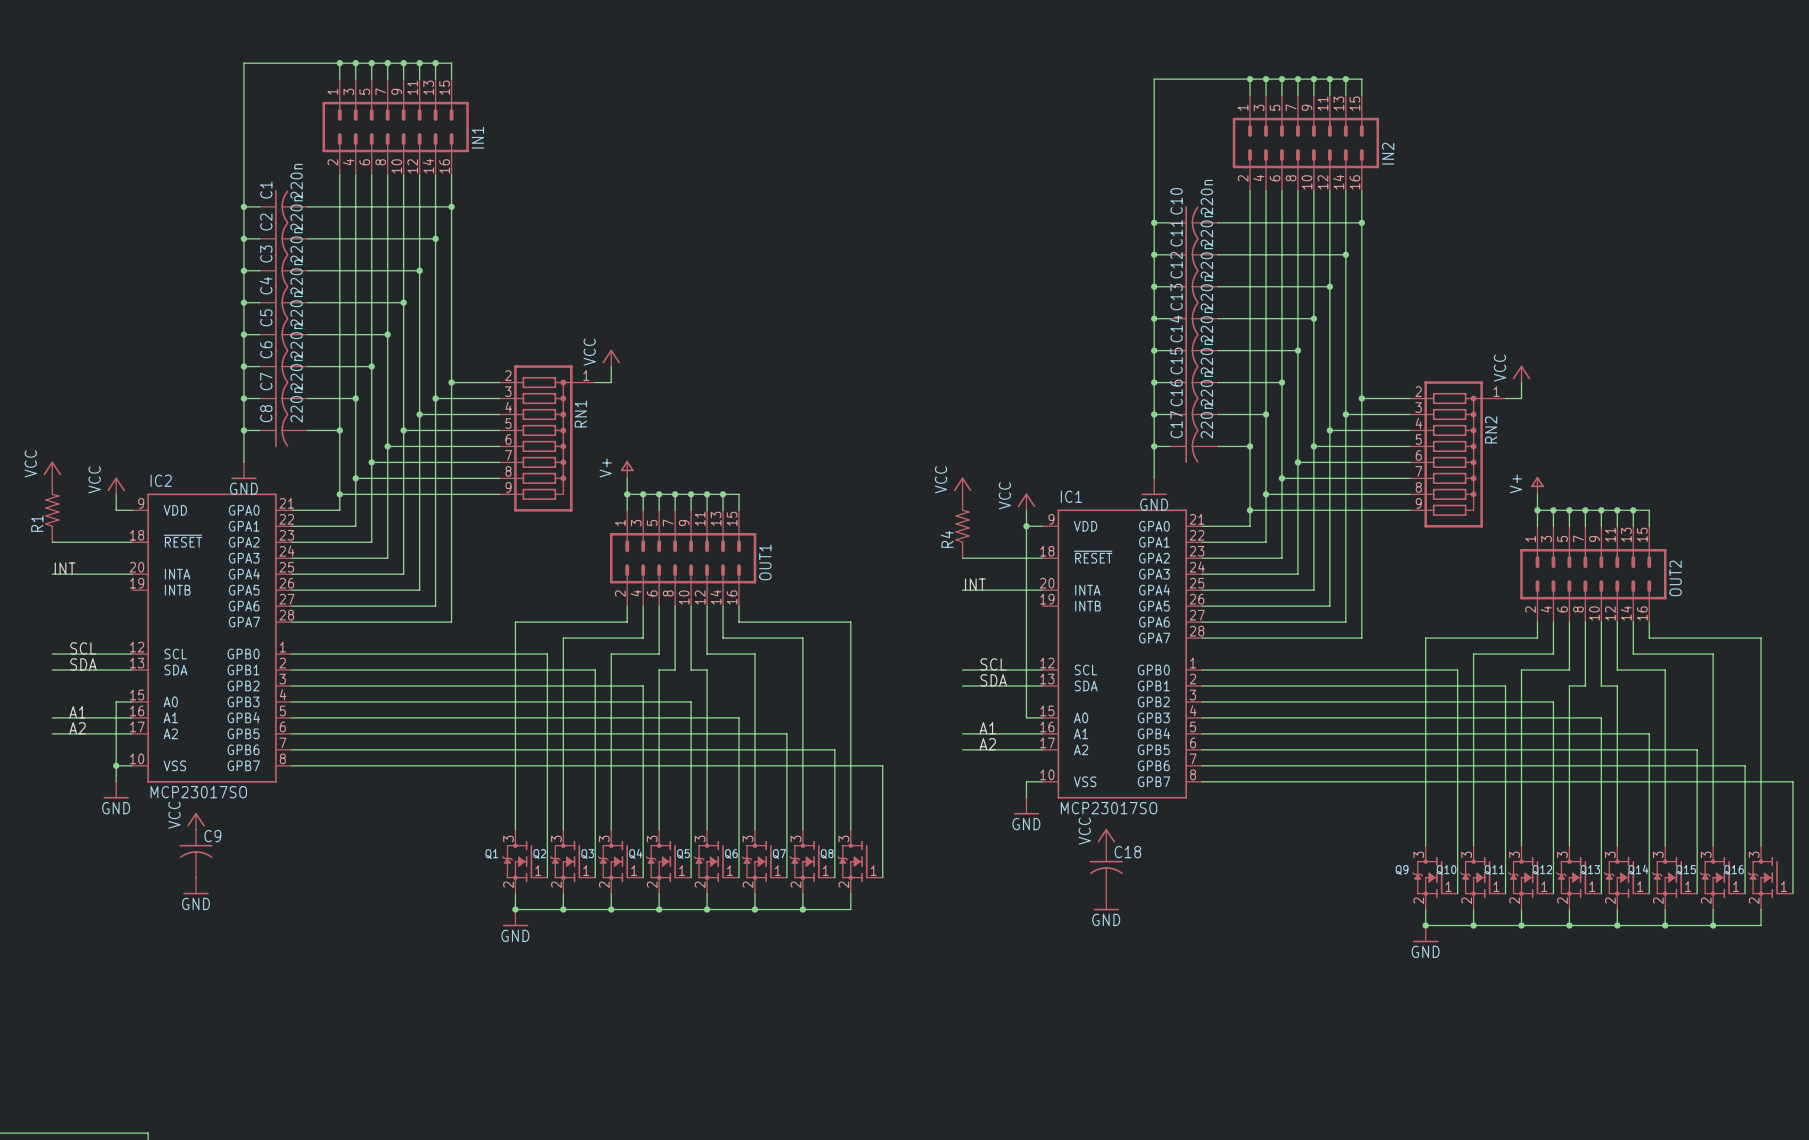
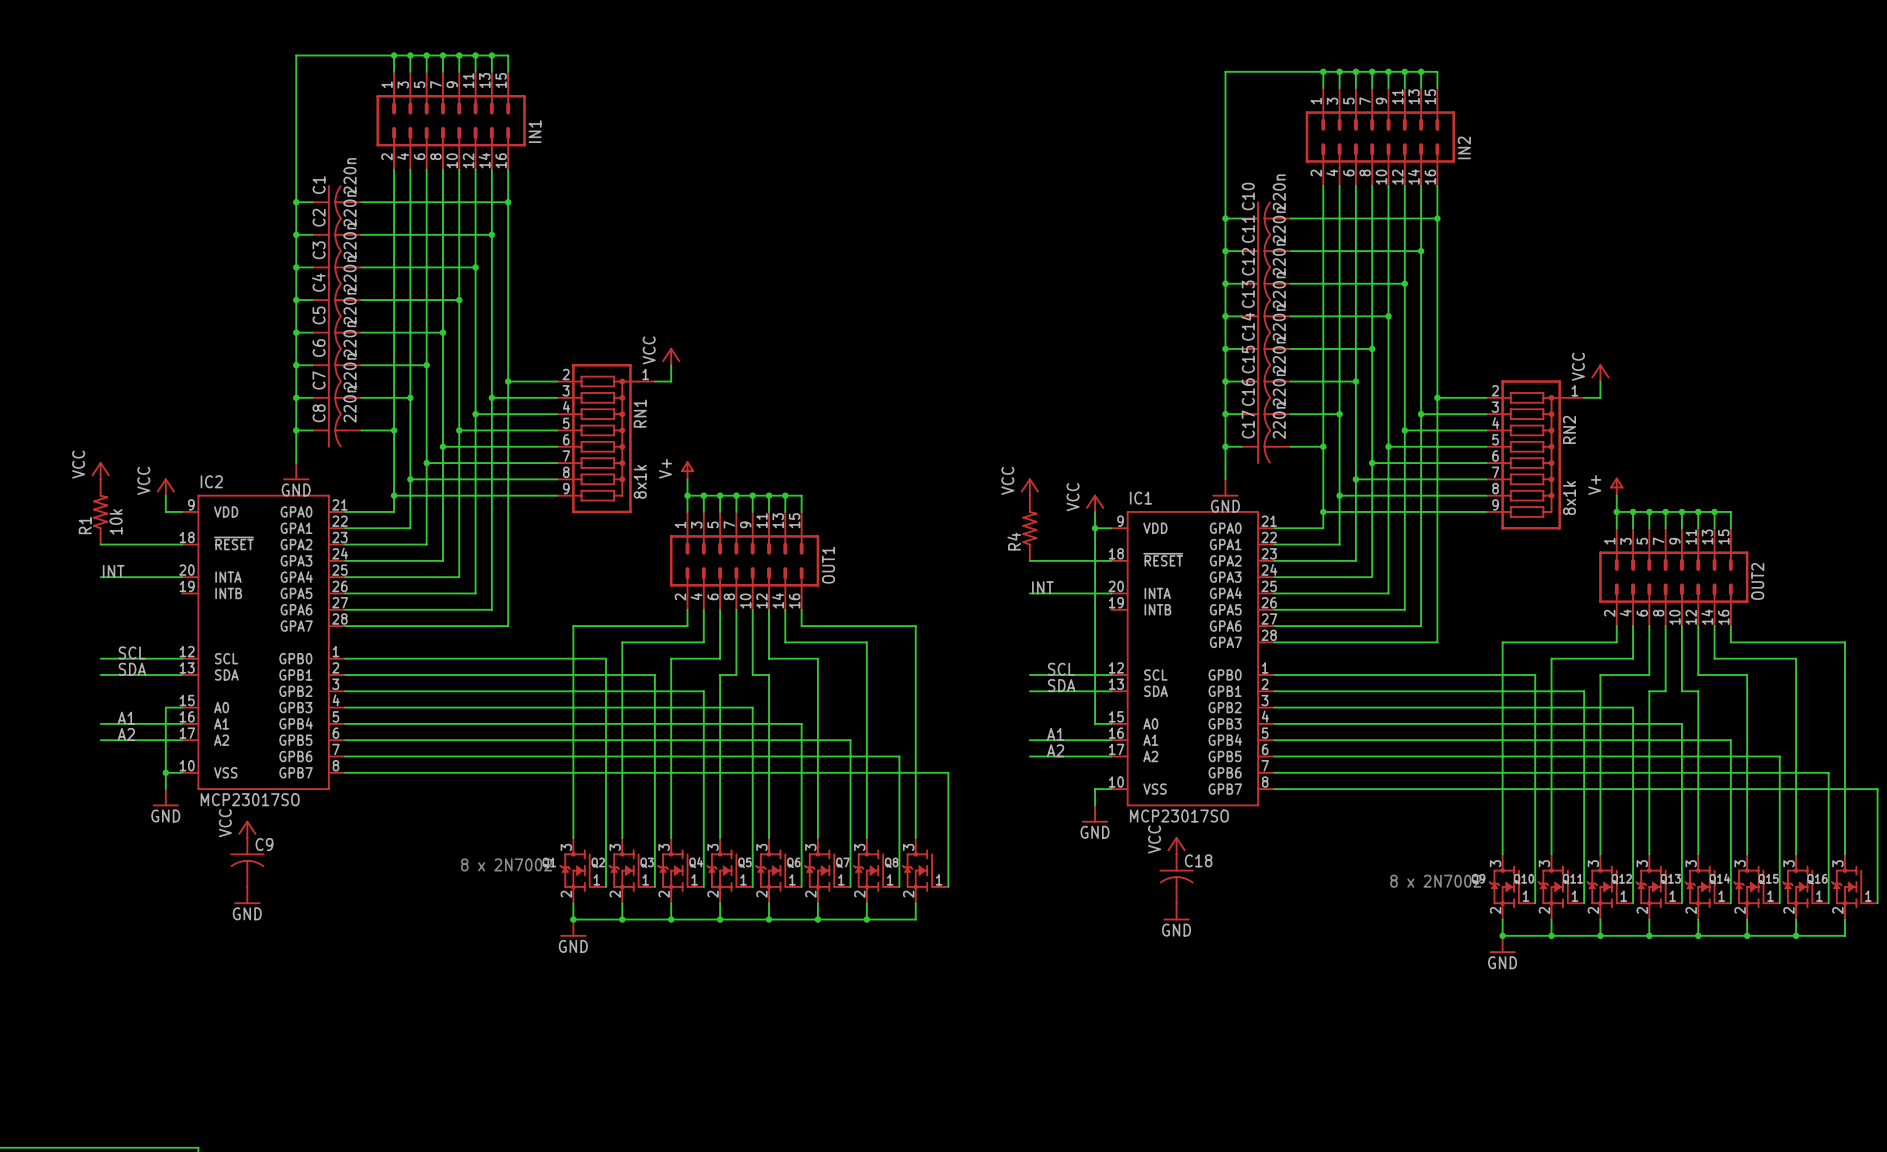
RN1 value: none -> 8x1k (640, 481)
RN2 value: none -> 8x1k (1569, 498)
R1 value: none -> 10k (116, 521)
text: none -> 8 x 2N7002 (506, 864)
text: none -> 8 x 2N7002 (1435, 881)

